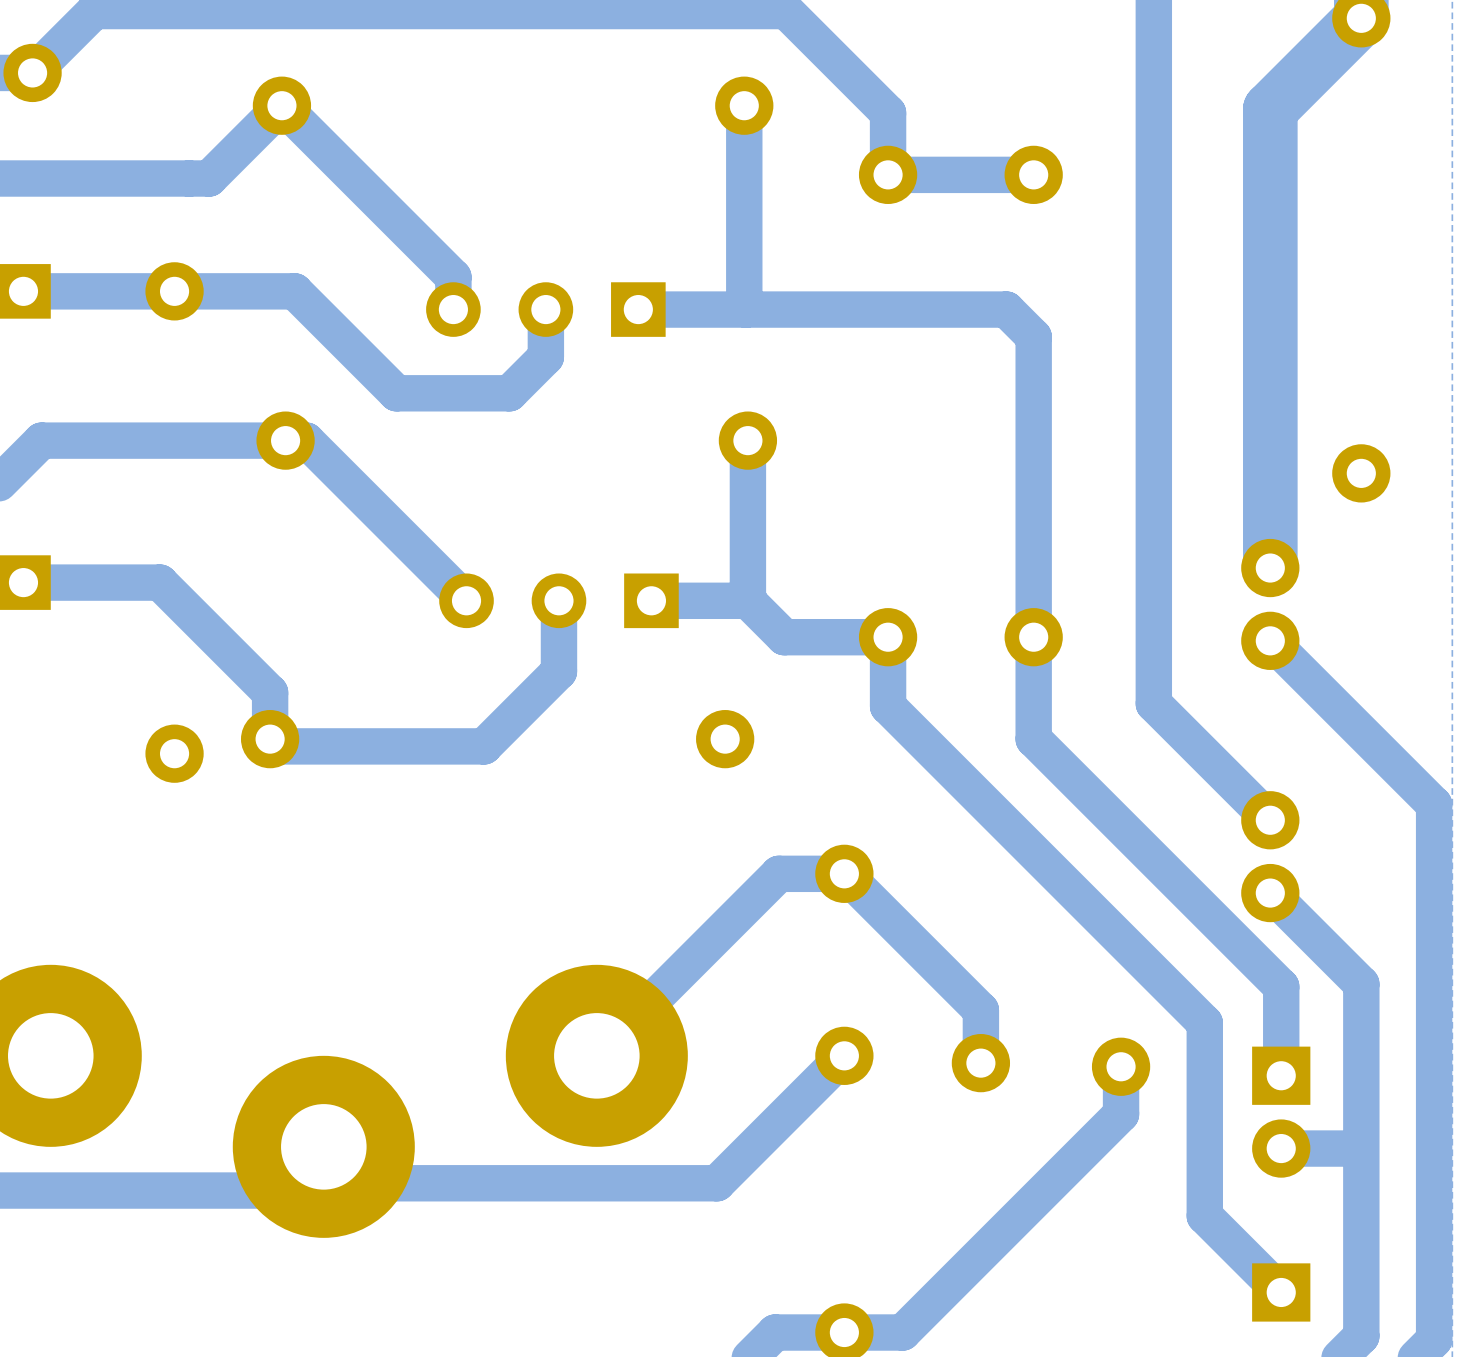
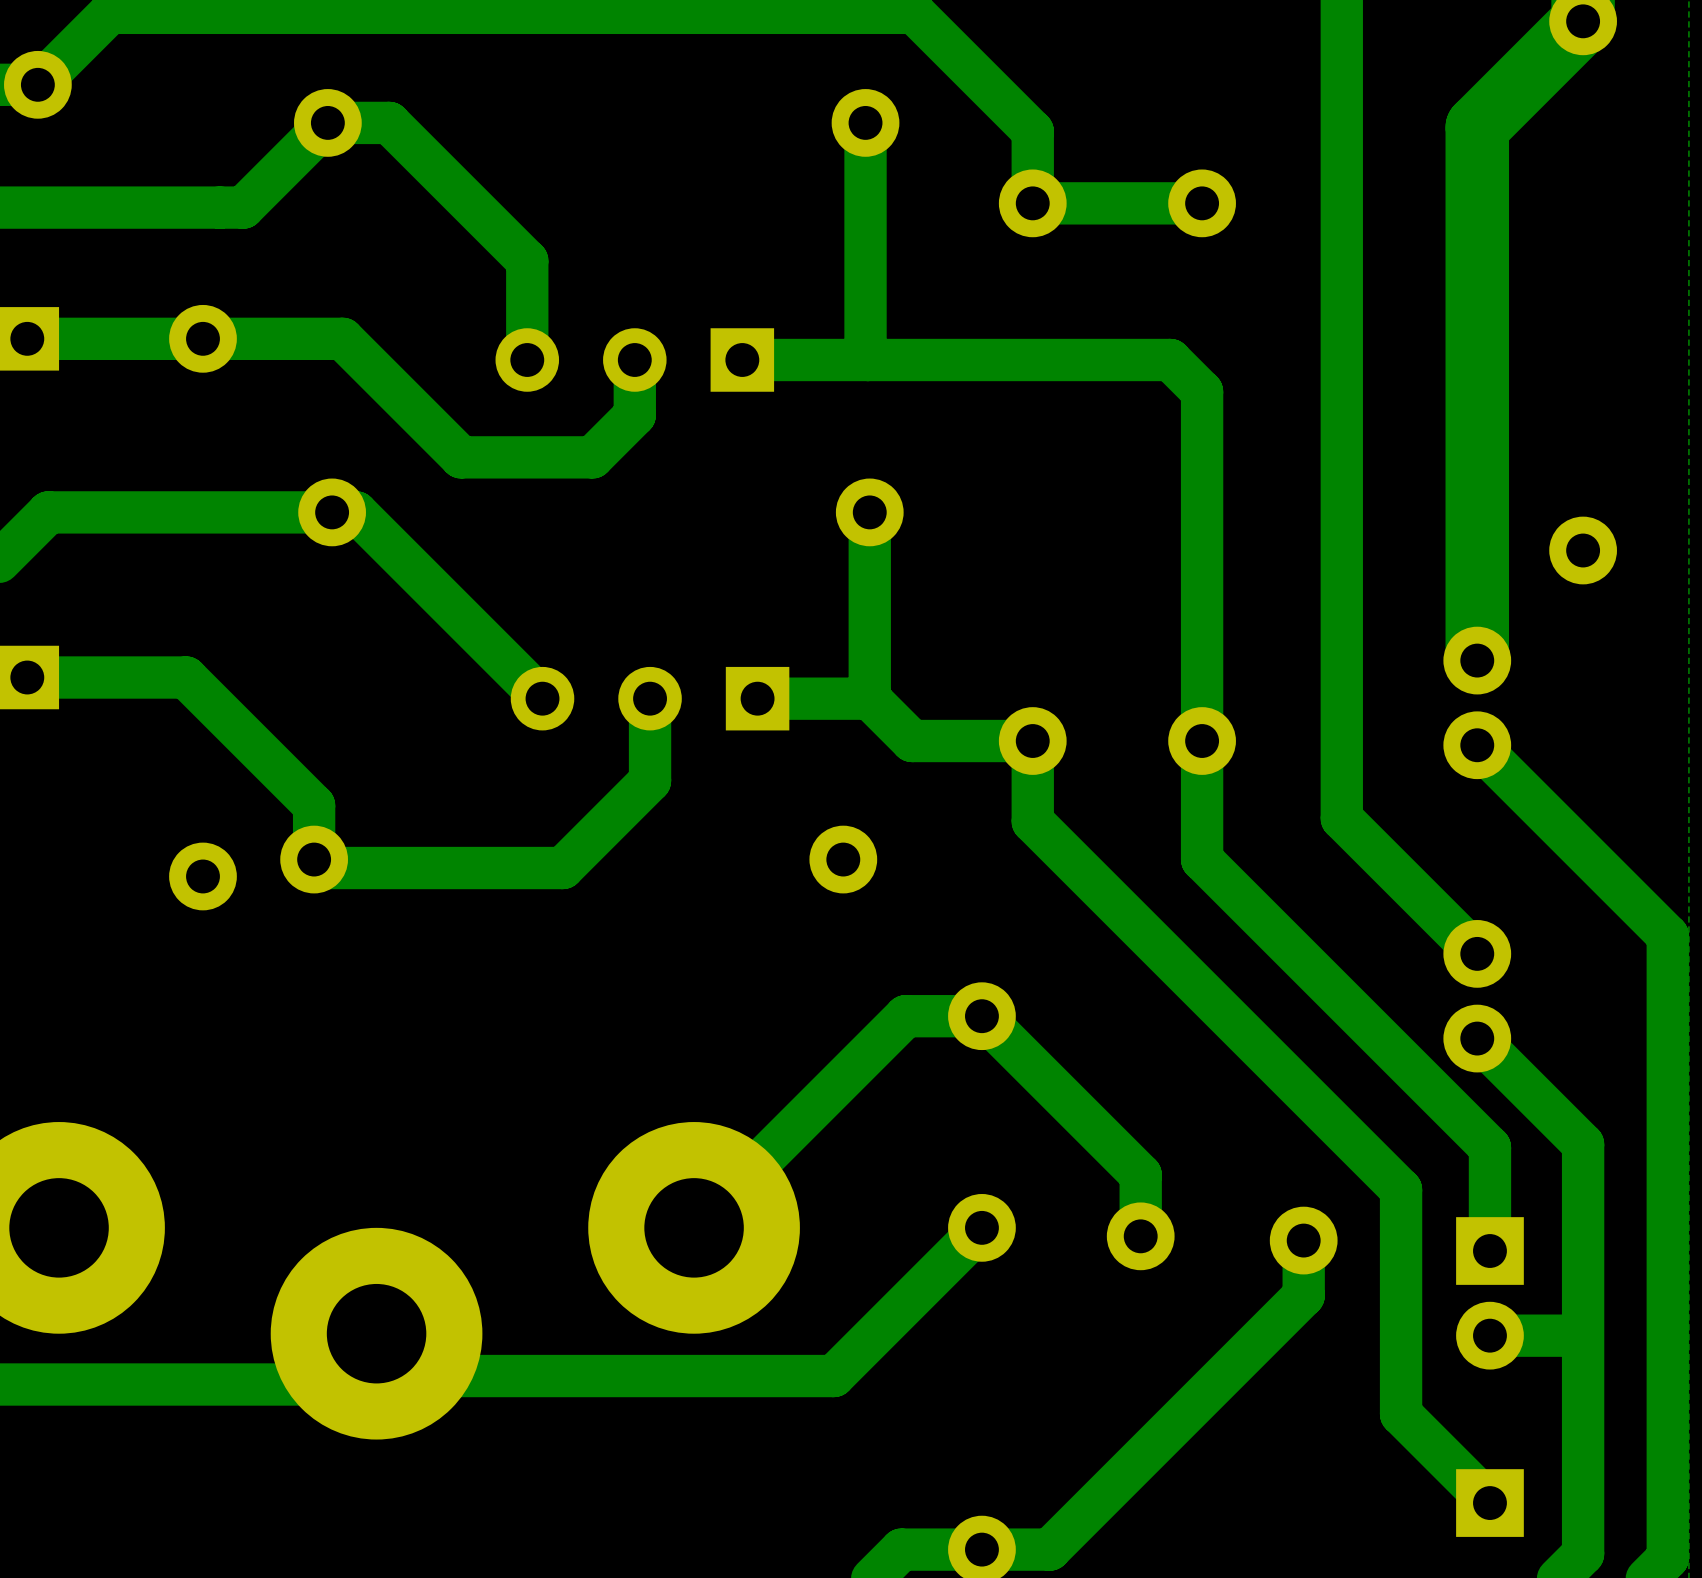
bottom track: (281, 105) (453, 277) -> (327, 122) (389, 122) (527, 260) (527, 322)

